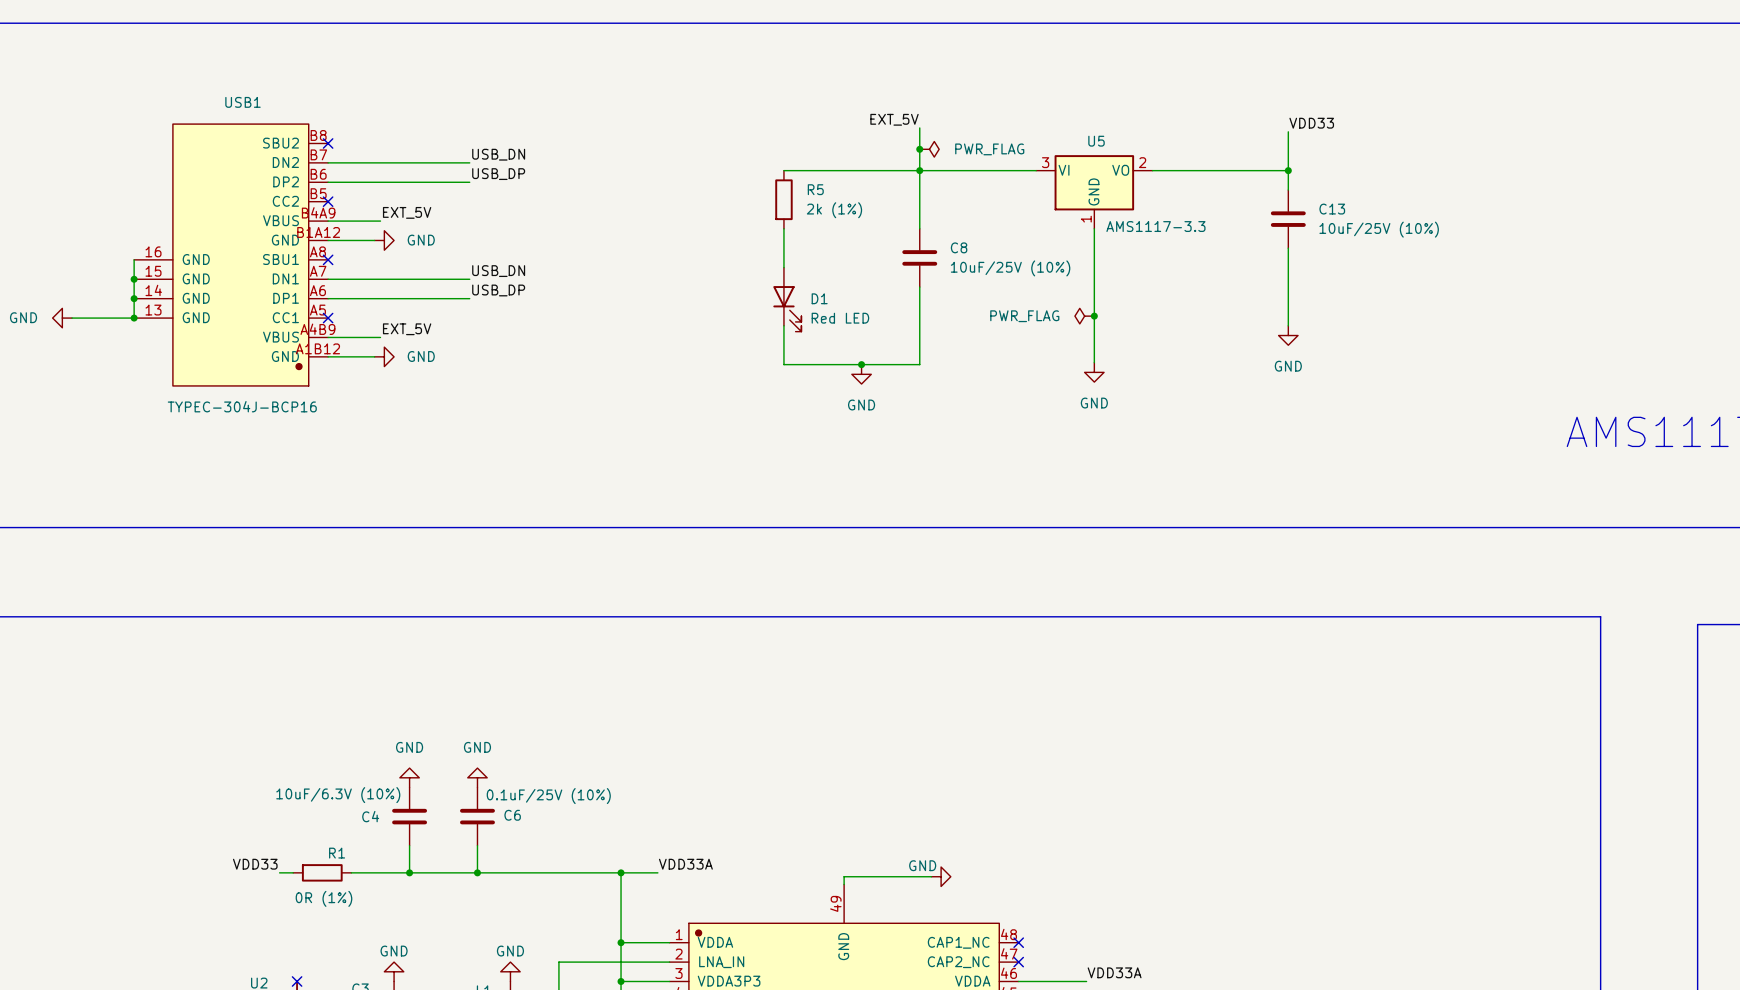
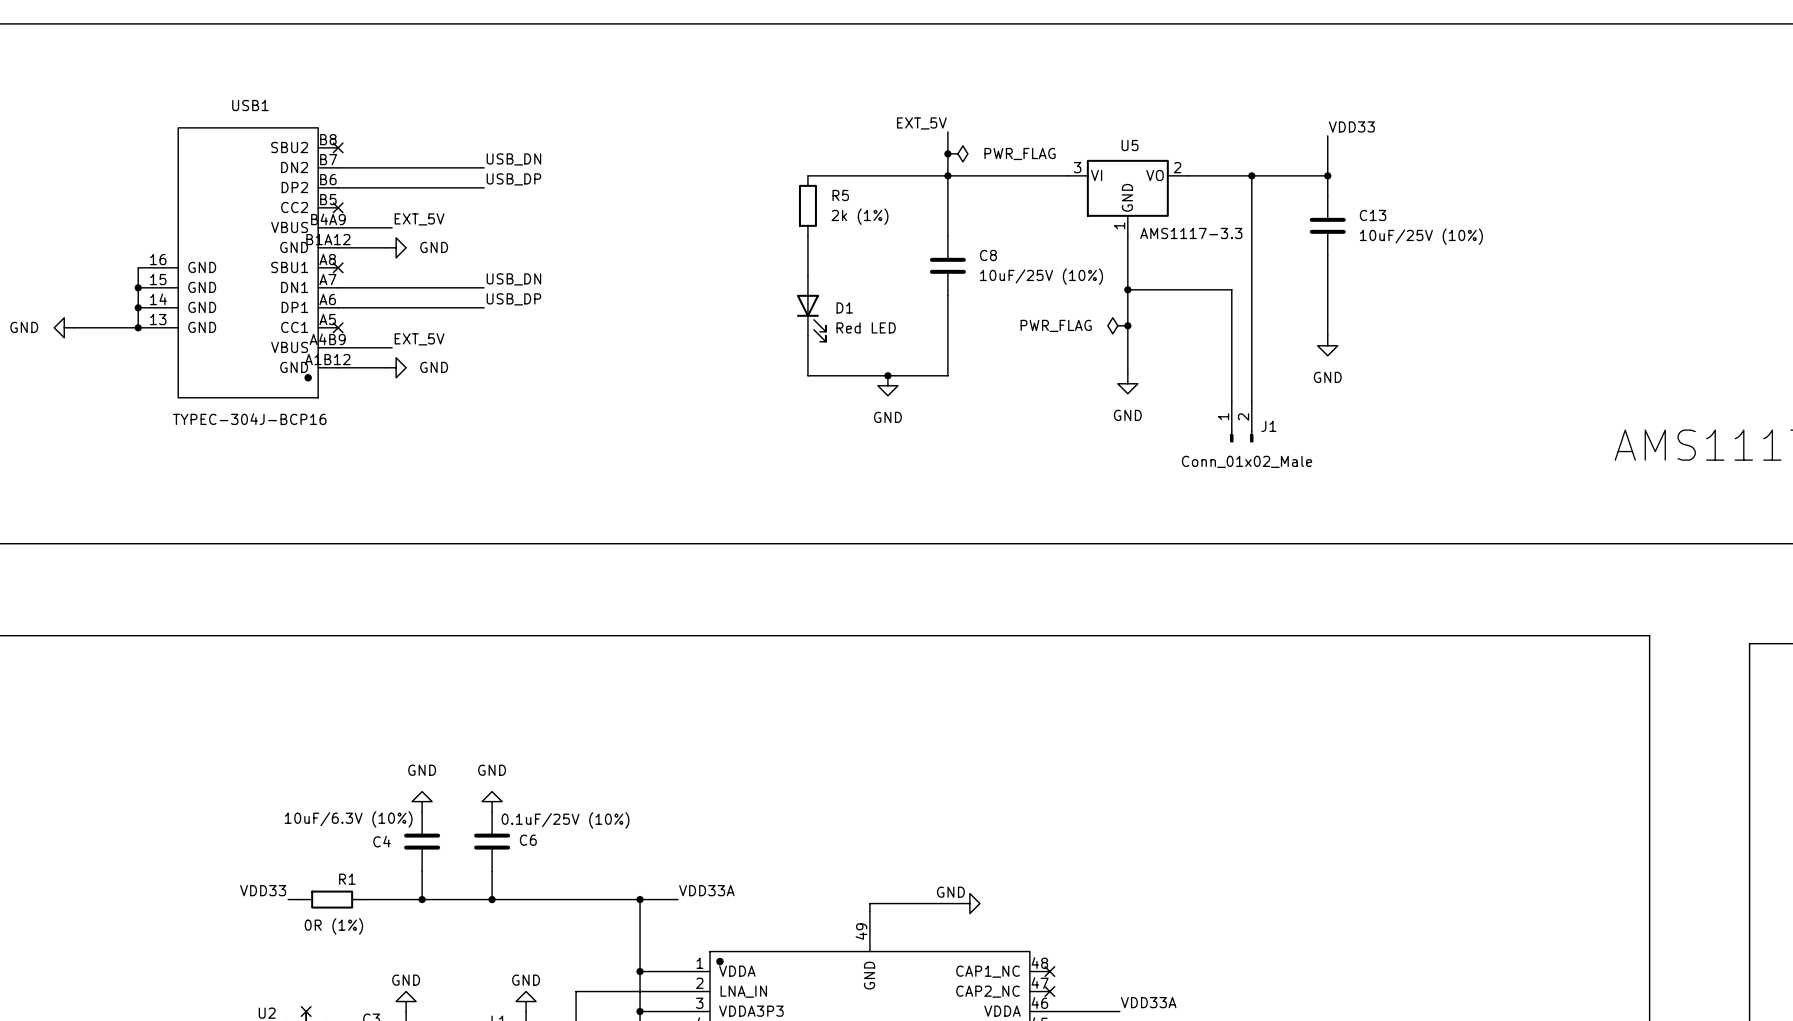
wire: none -> (1251, 175) (1251, 401)
junction: none -> (1251, 175)
wire: none -> (1127, 289) (1231, 289) (1231, 401)
junction: none -> (1127, 289)
J1: none -> Conn_01x02_Male (1241, 422)

